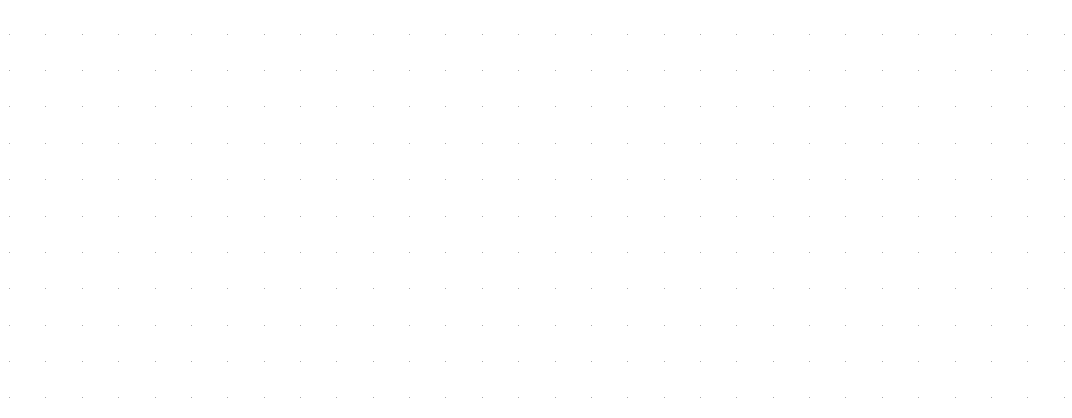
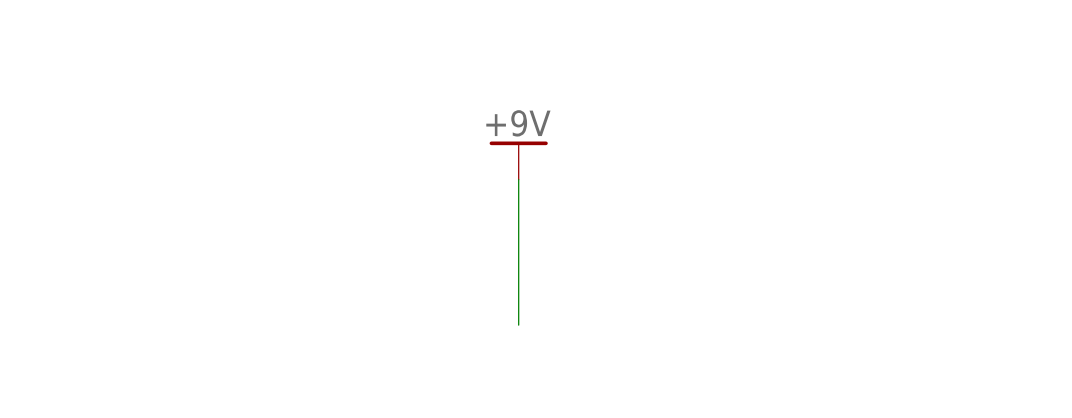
power symbol: none -> +9V (518, 160)
wire: none -> (518, 179) (518, 325)

